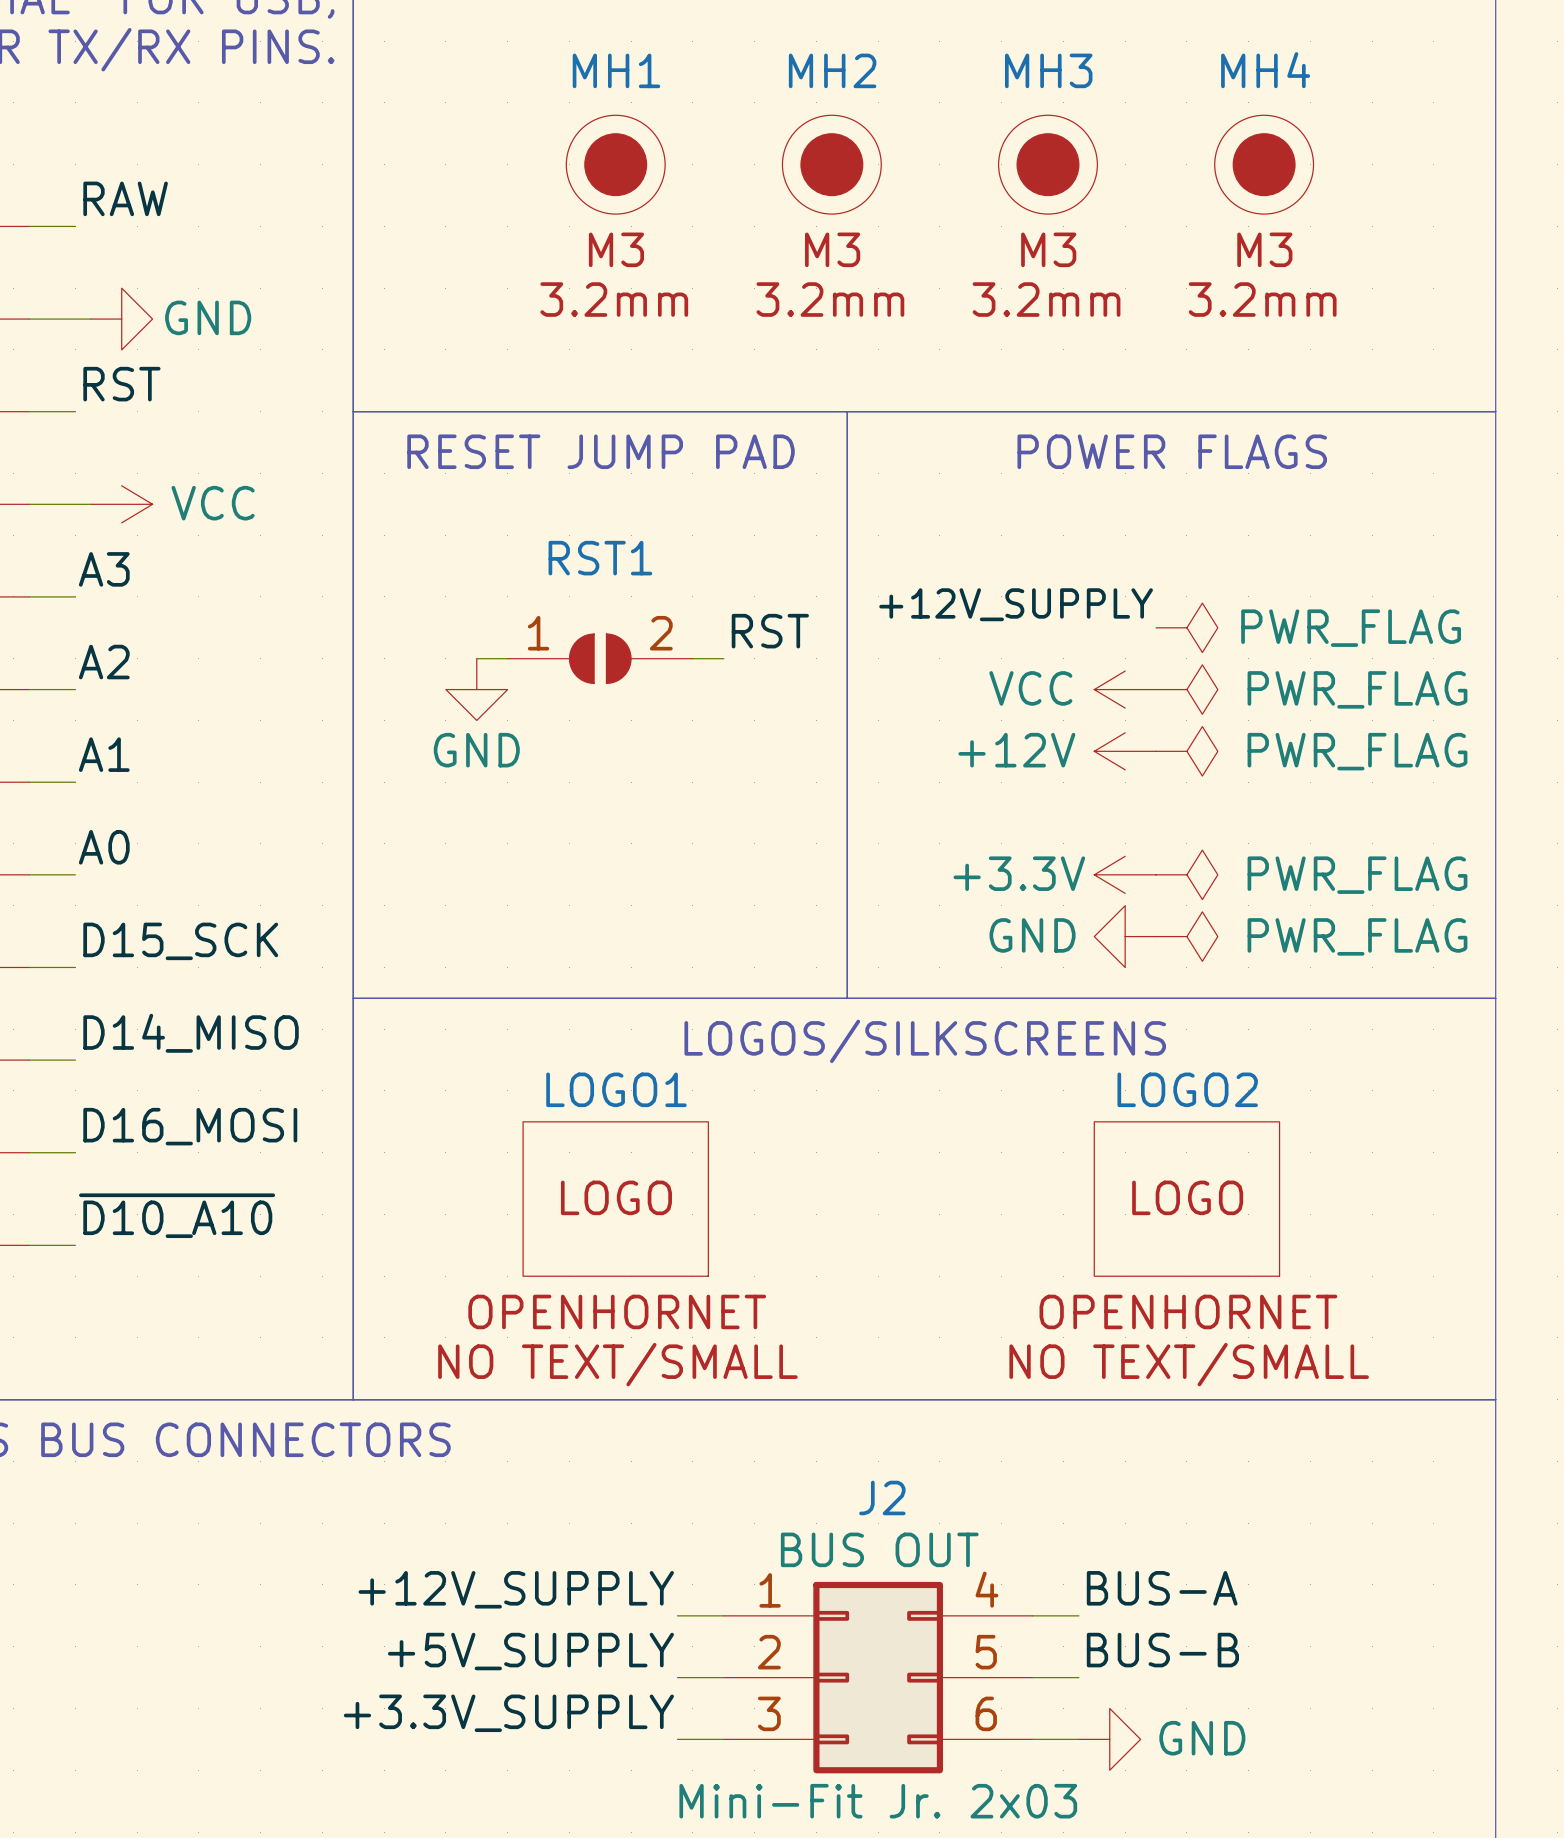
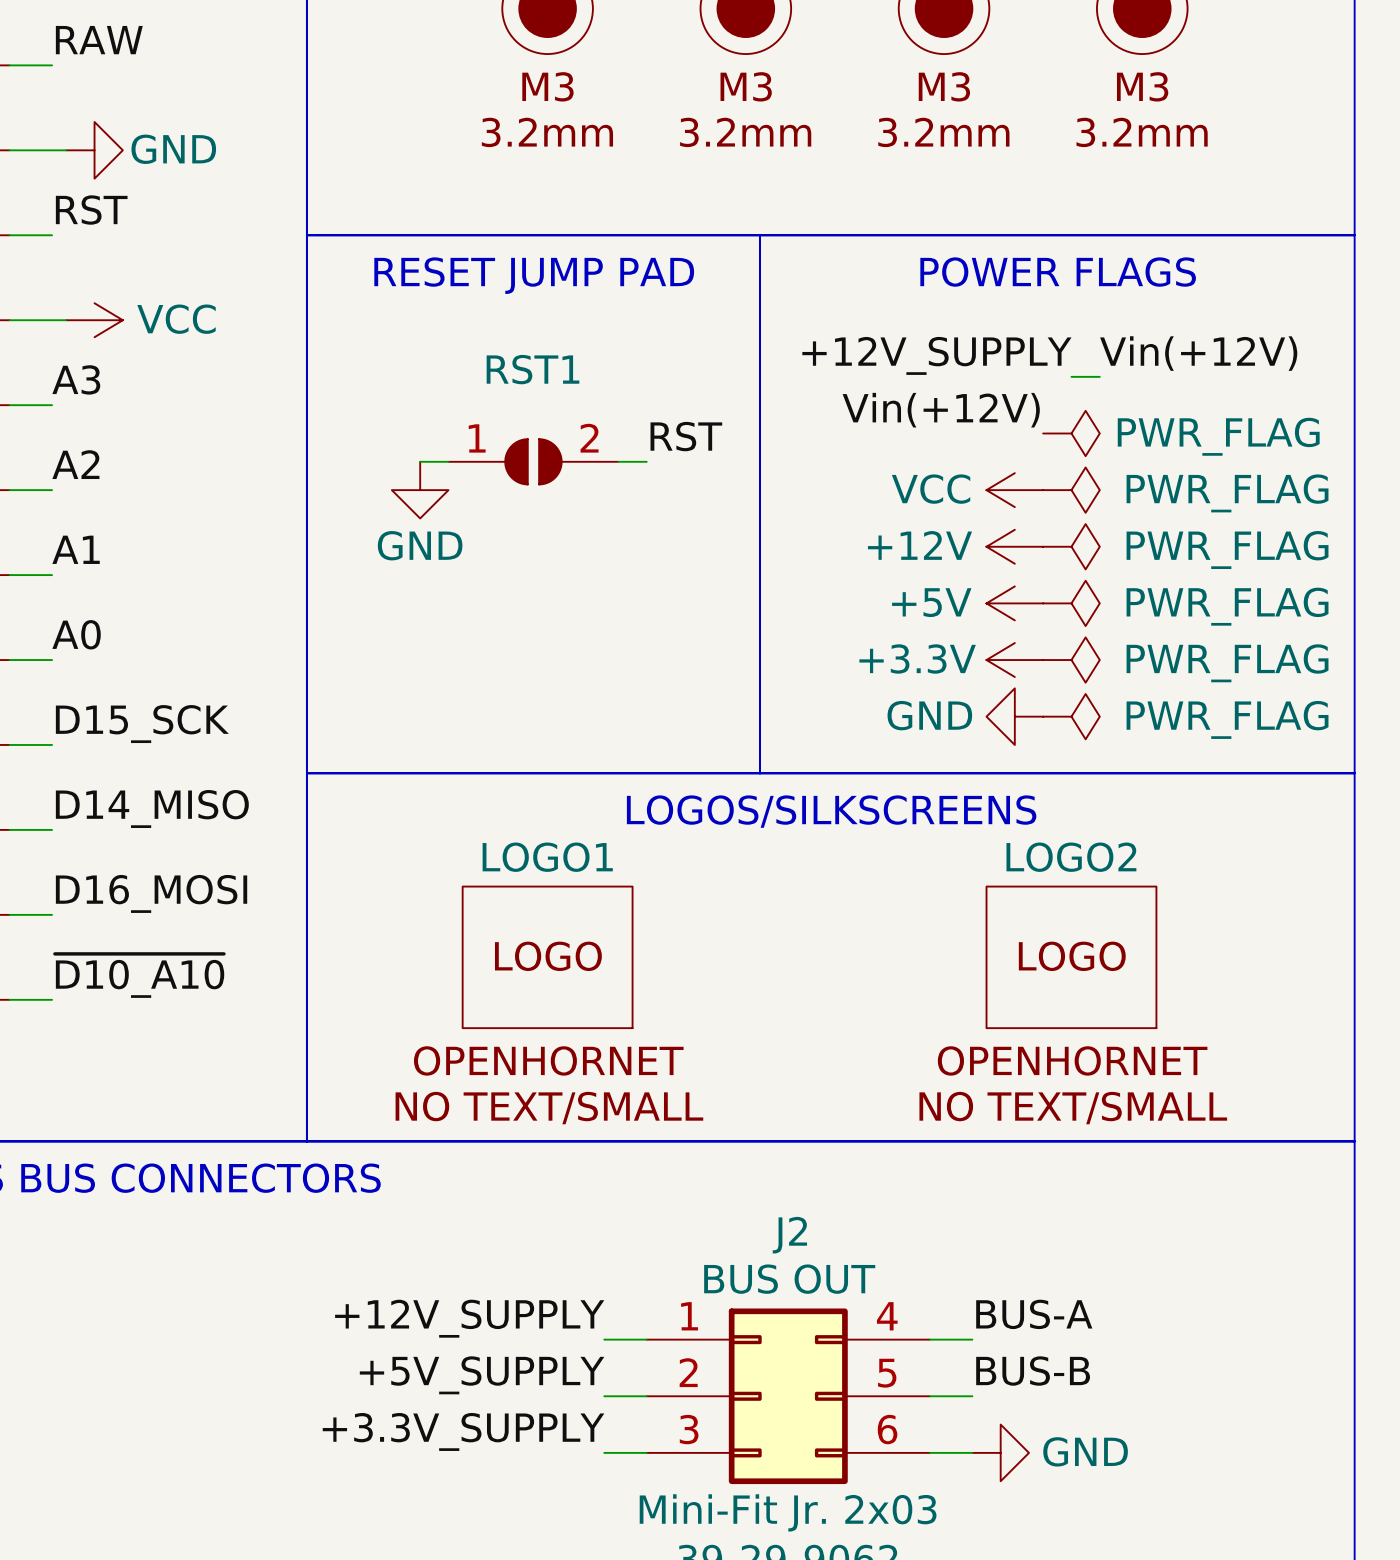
label: none -> +12V_SUPPLY (936, 355)
label: none -> Vin(+12V) (1198, 353)
wire: none -> (1071, 376) (1099, 376)
label: +12V_SUPPLY (1016, 604) -> Vin(+12V) (941, 410)
power symbol: none -> +5V (1014, 603)
power symbol: none -> PWR_FLAG (1071, 603)

